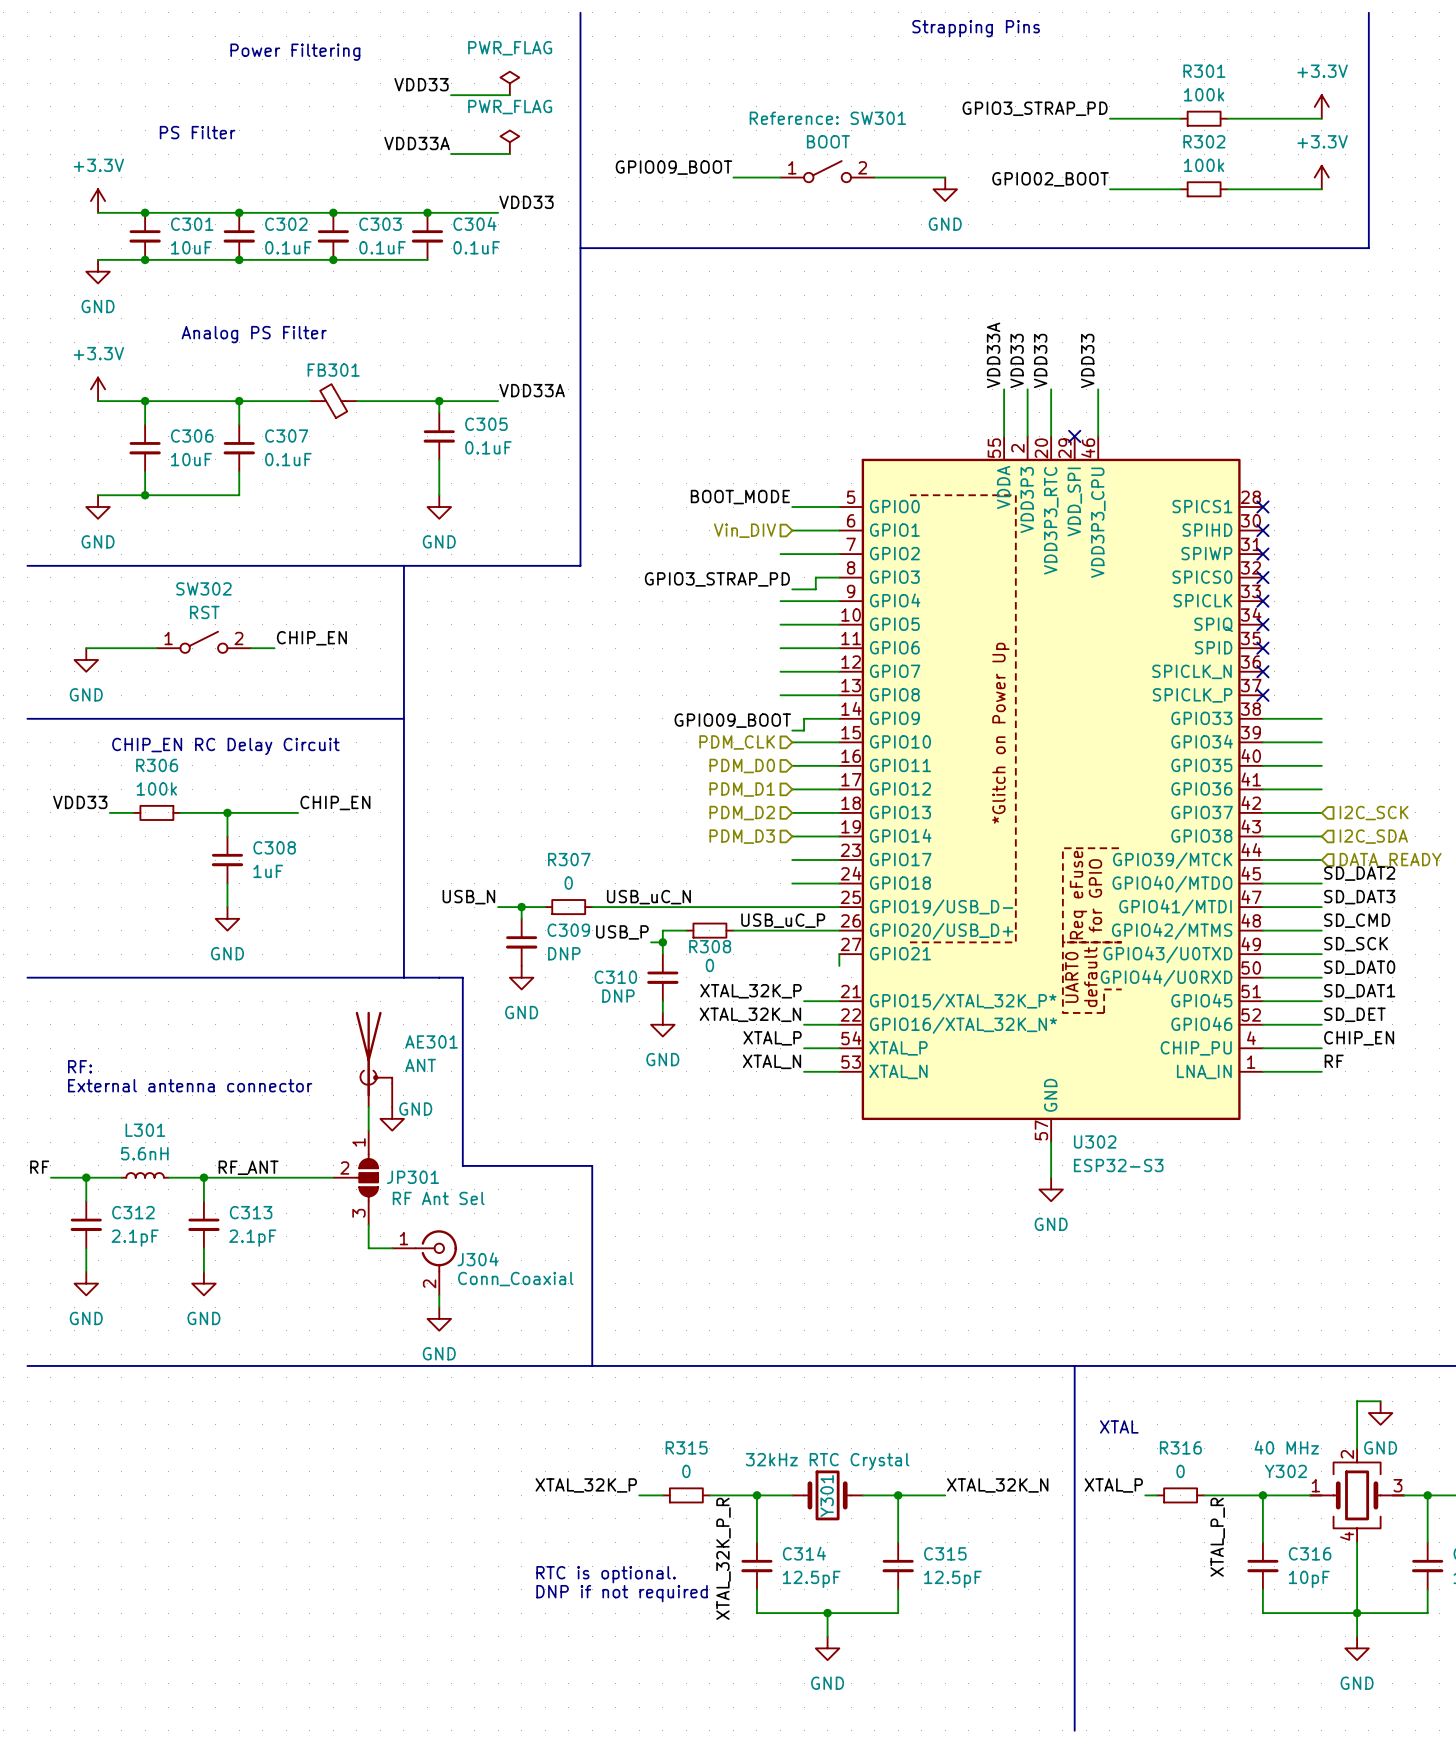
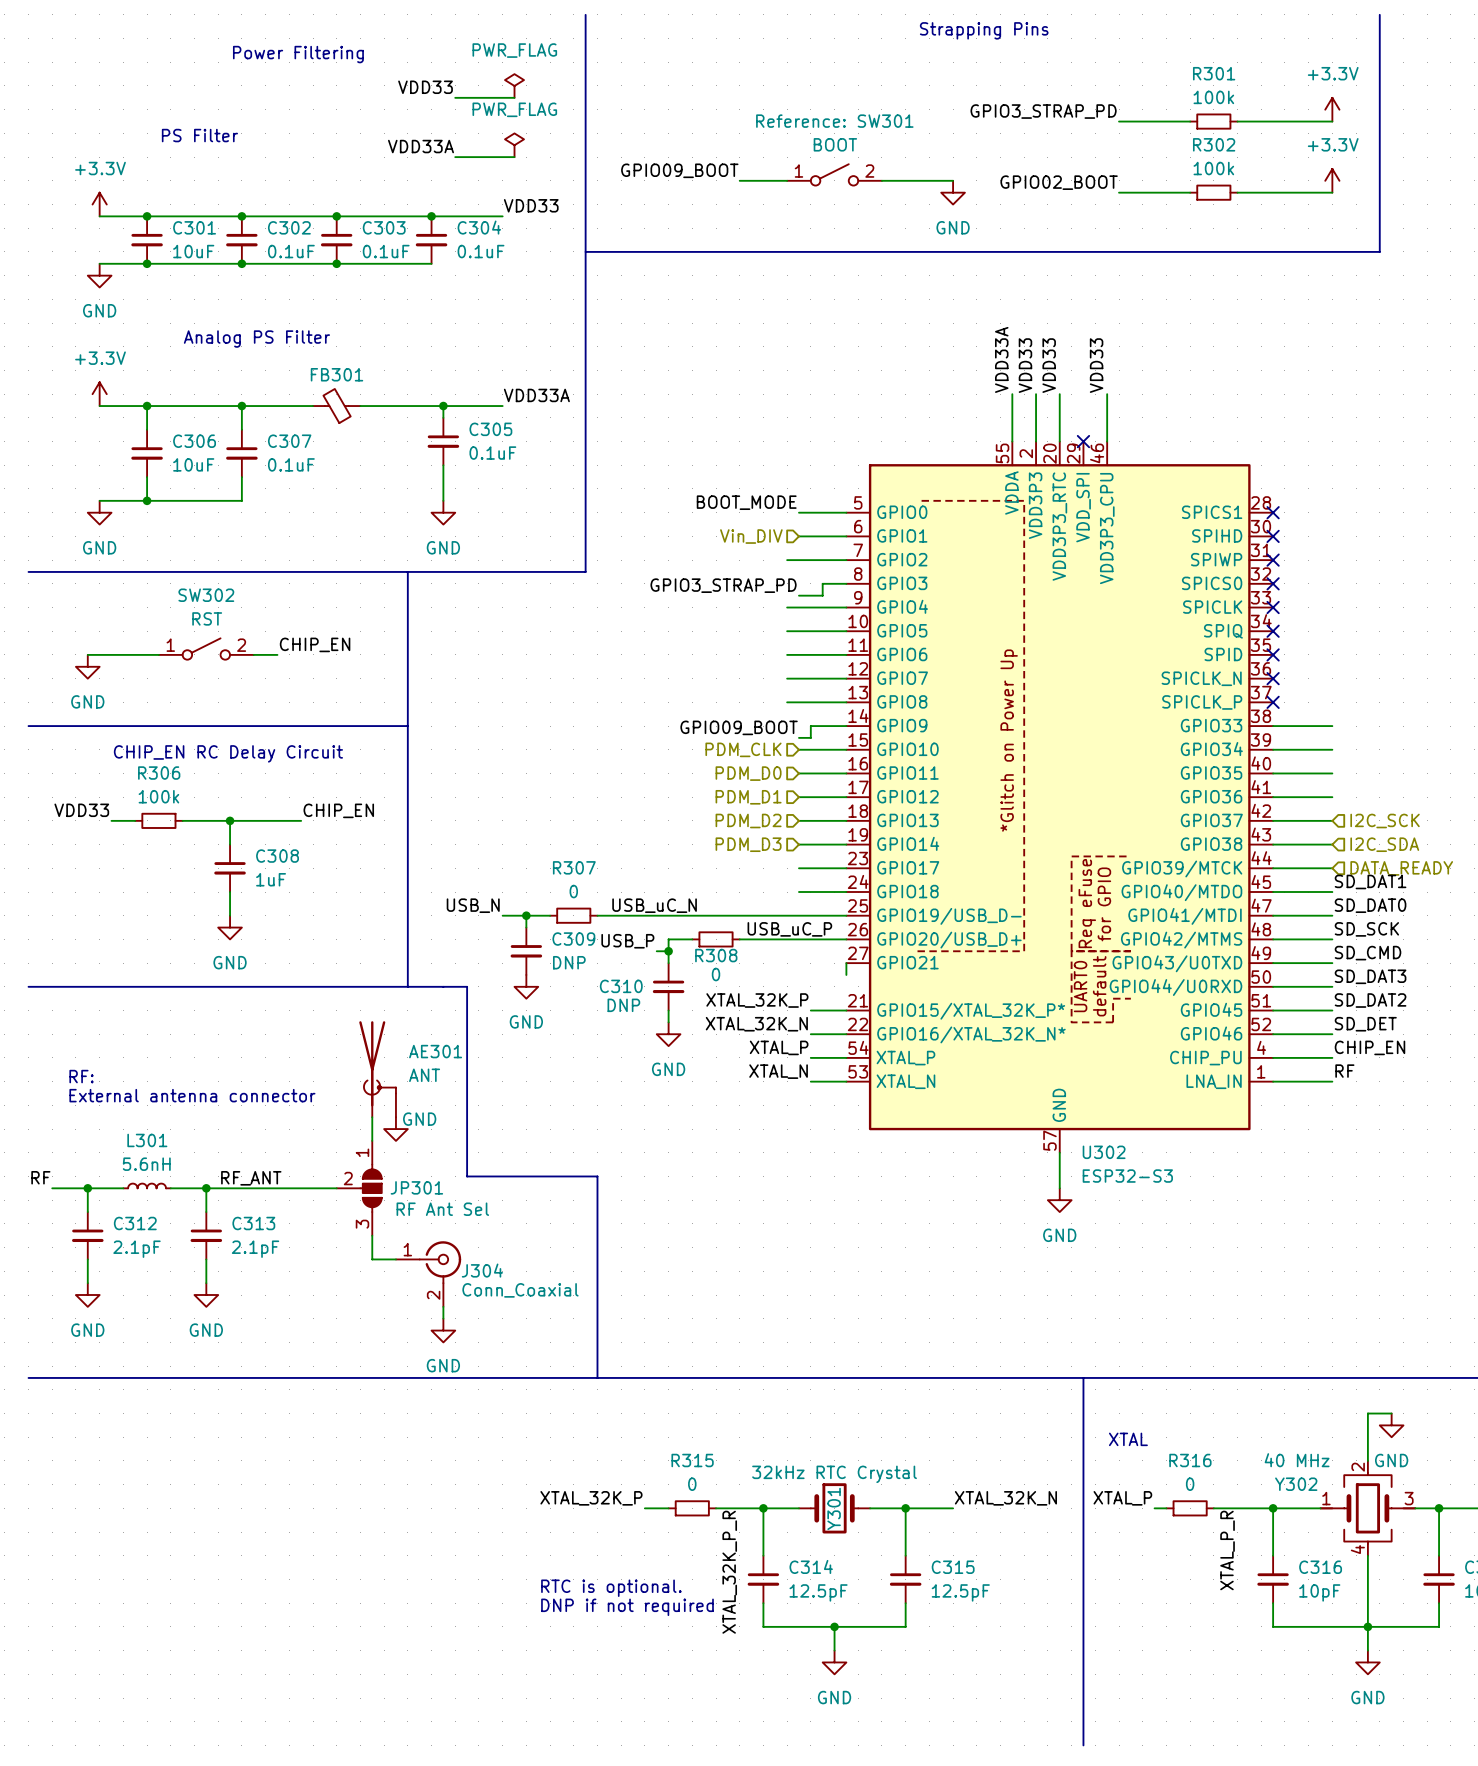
label: SD_DAT2 (1359, 873) -> SD_DAT1 (1370, 881)
label: SD_DAT3 (1359, 897) -> SD_DAT0 (1370, 905)
label: SD_CMD (1357, 920) -> SD_SCK (1366, 929)
label: SD_SCK (1356, 944) -> SD_CMD (1368, 953)
label: SD_DAT0 (1359, 967) -> SD_DAT3 (1370, 976)
label: SD_DAT1 (1359, 991) -> SD_DAT2 (1370, 1000)

